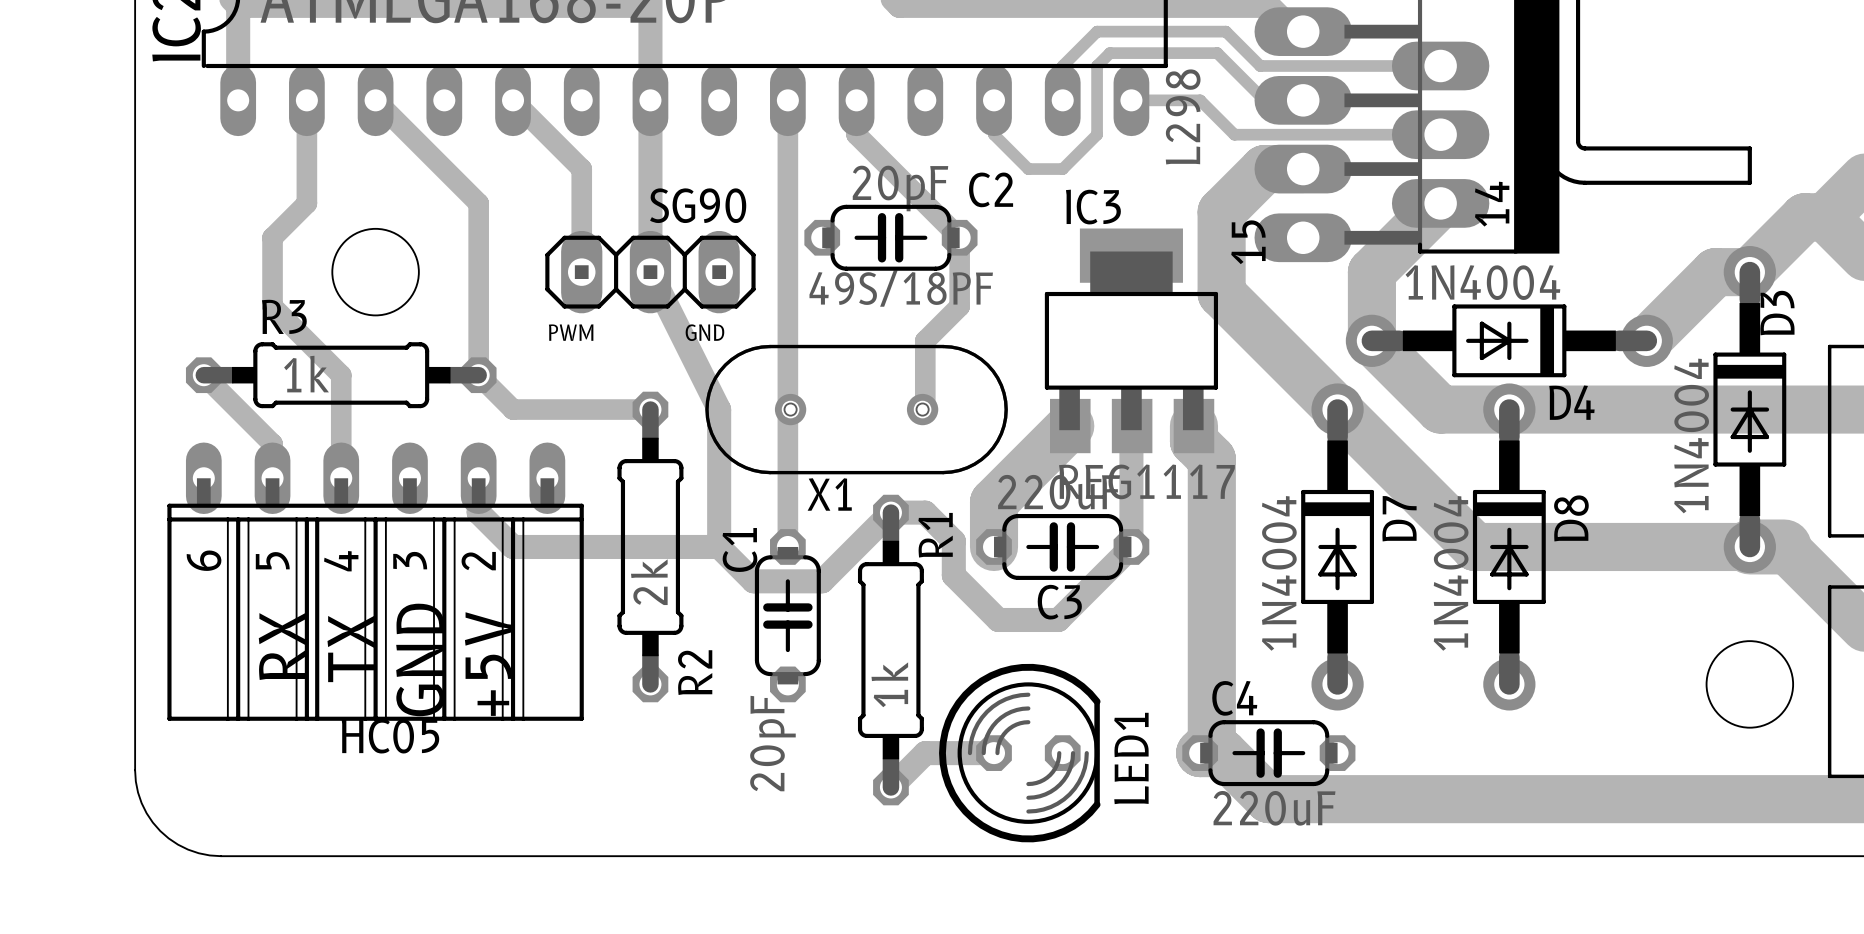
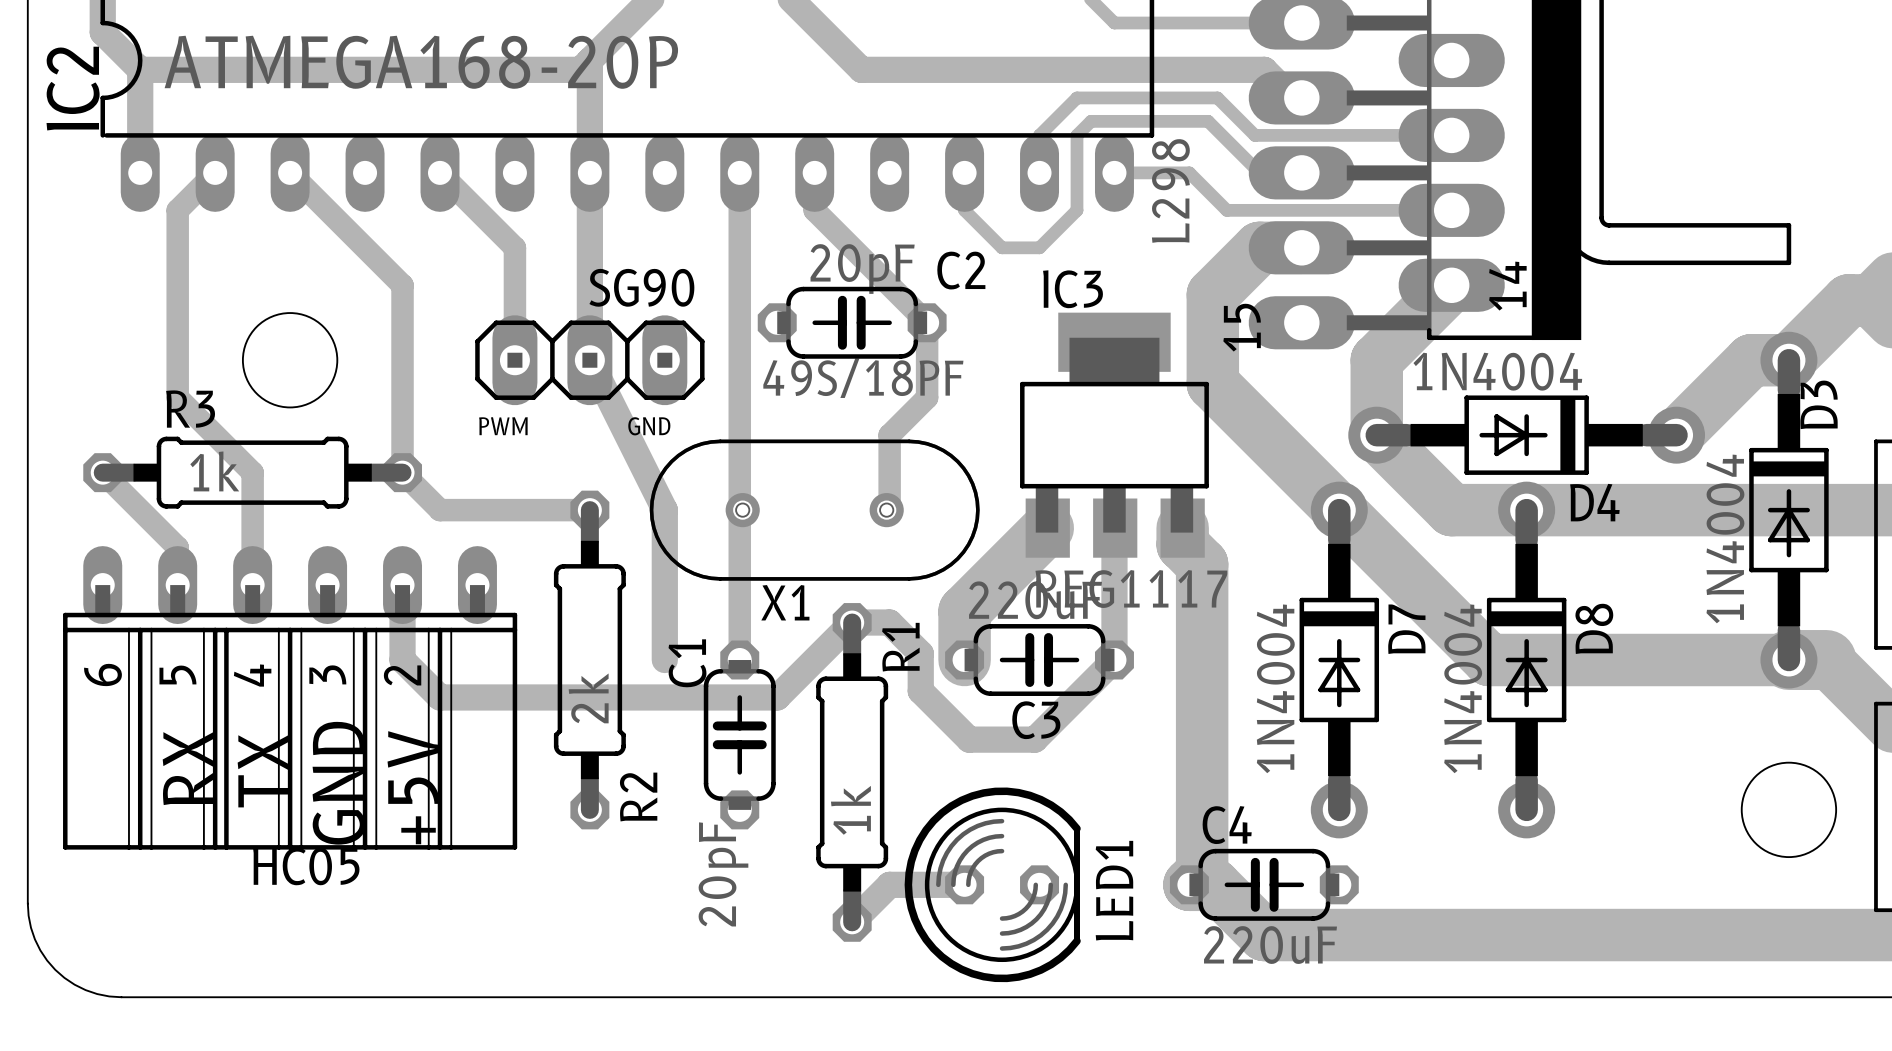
track: (306, 100) (306, 203) (272, 237) -> (215, 172) (177, 210) (177, 322)
track: (478, 512) (513, 546) (719, 546) (753, 581) -> (402, 622) (402, 660) (439, 697) (702, 697)

